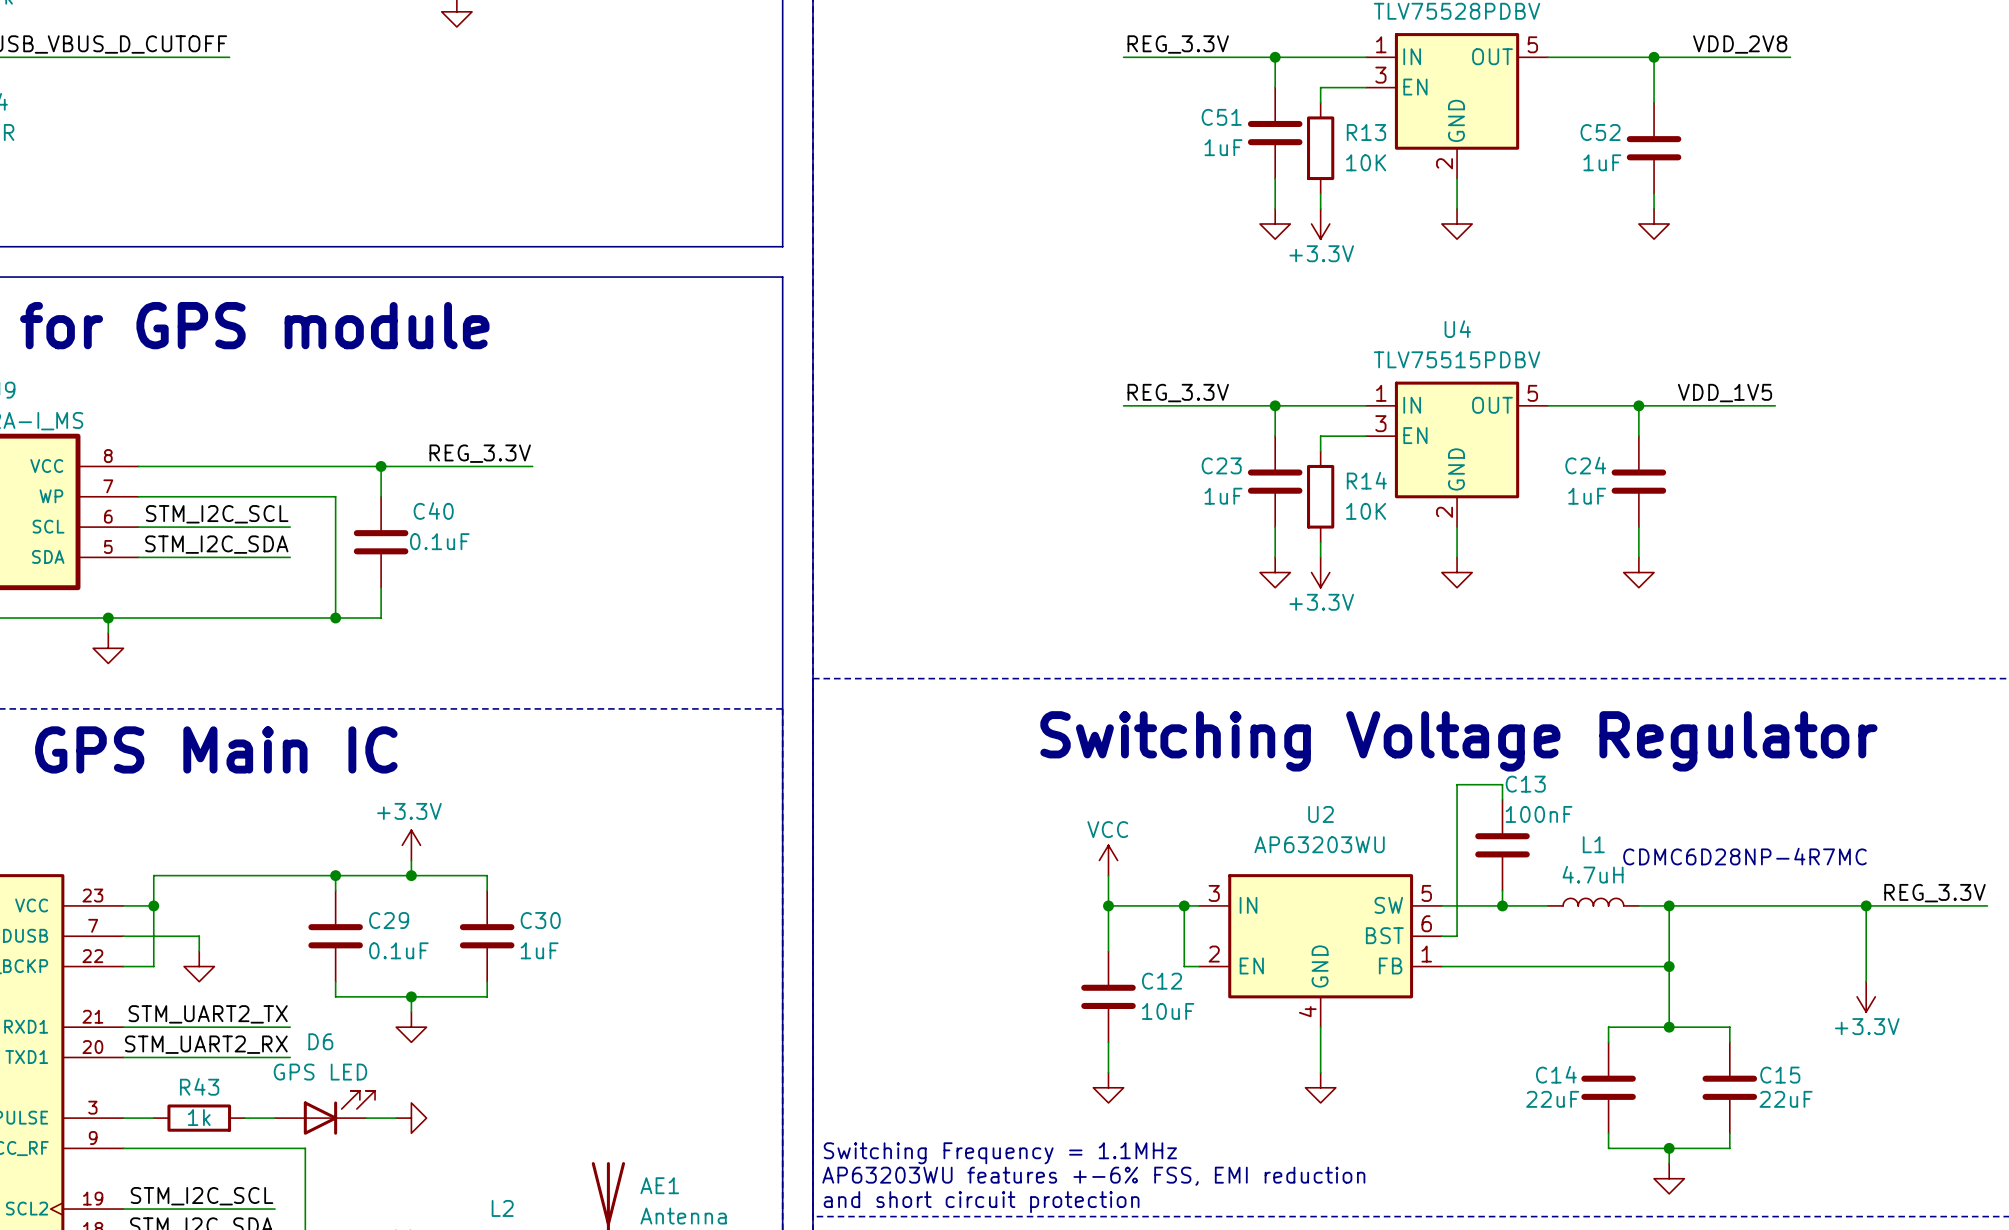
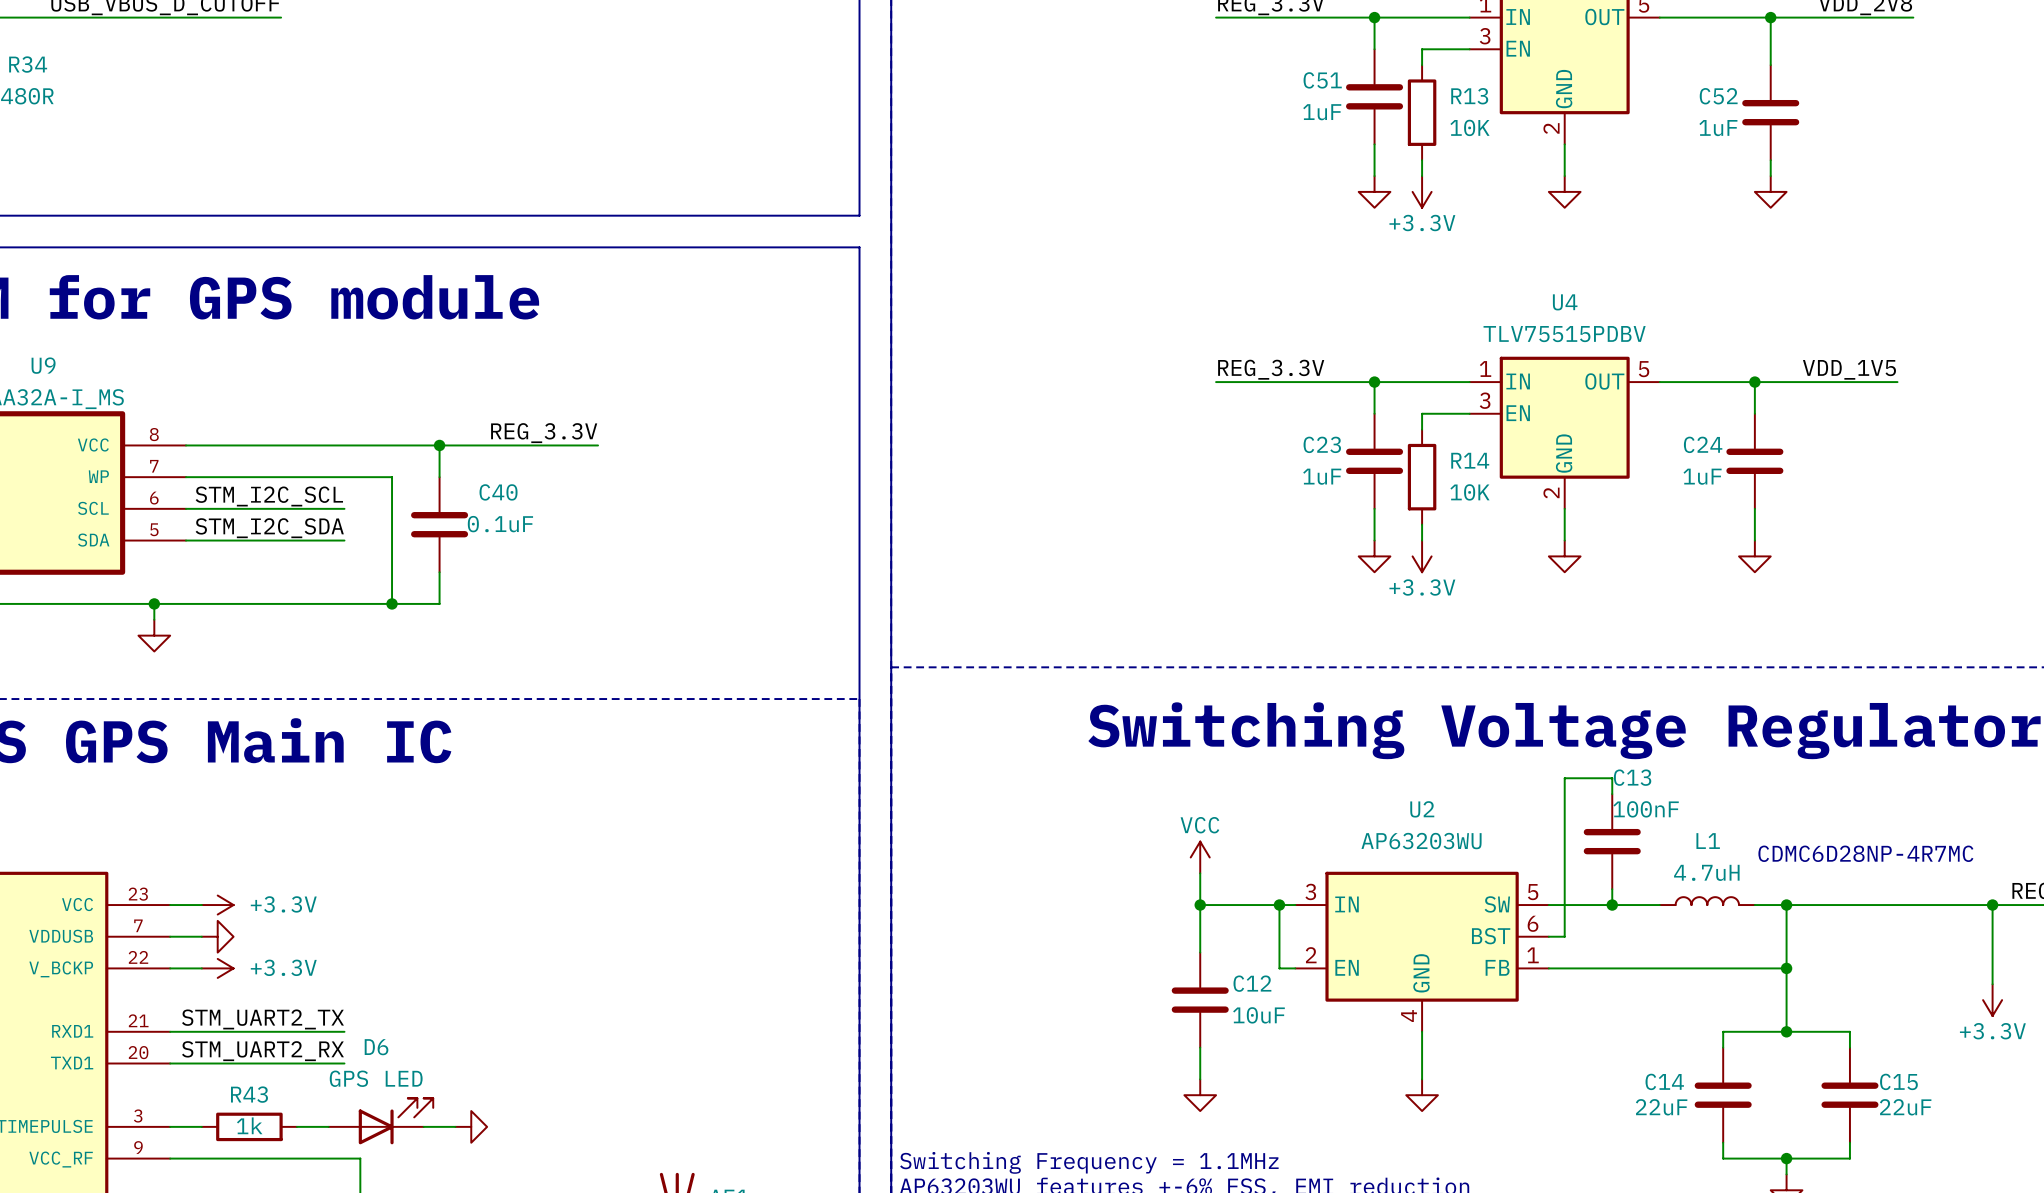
power symbol: +3.3V (411, 845) -> none
wire: (411, 860) (411, 875) -> none
wire: (335, 875) (335, 890) -> none
junction: (335, 875) -> none
junction: (411, 875) -> none
wire: (487, 890) (487, 875) (153, 875) (153, 966) -> none
junction: (153, 905) -> none
power symbol: none -> +3.3V (217, 905)
wire: (153, 936) (199, 936) (199, 951) -> none
C29: 0.1uF (335, 936) -> none
C30: 1uF (487, 936) -> none
power symbol: none -> +3.3V (217, 968)
power symbol rotation: 0° (199, 966) -> 90° counterclockwise (217, 936)
power symbol position: (199, 966) -> (217, 936)
wire: (335, 981) (335, 996) (487, 996) (487, 981) -> none
wire: (411, 996) (411, 1012) -> none
junction: (411, 996) -> none
power symbol: (411, 1027) -> none

